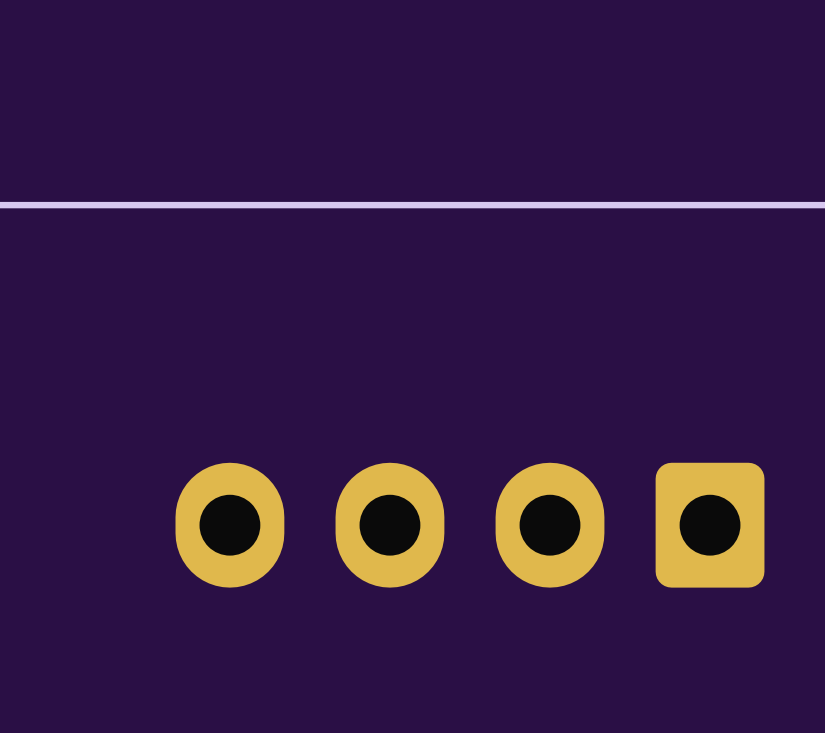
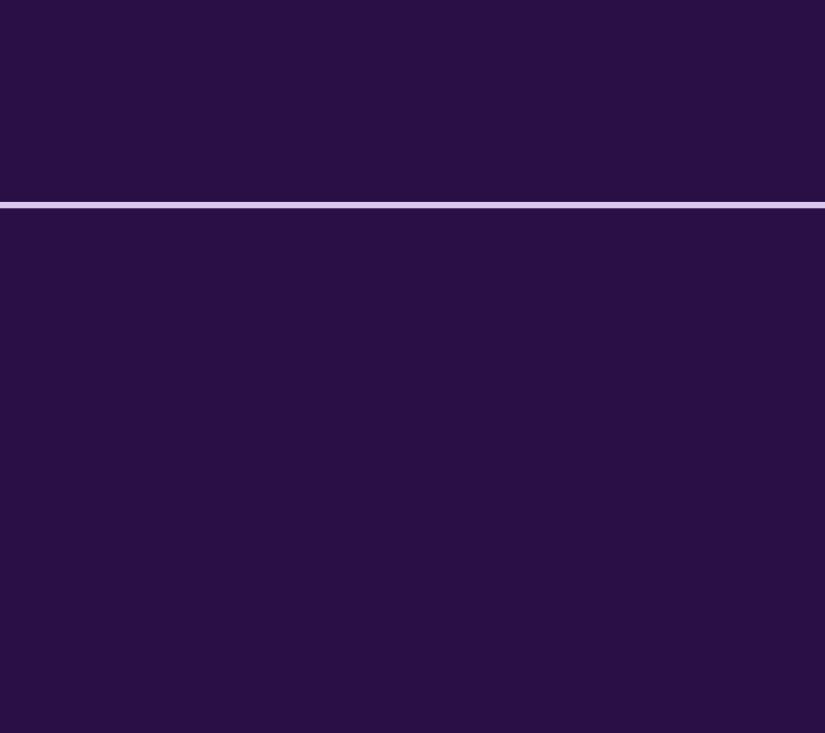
part: (469, 525) -> none

